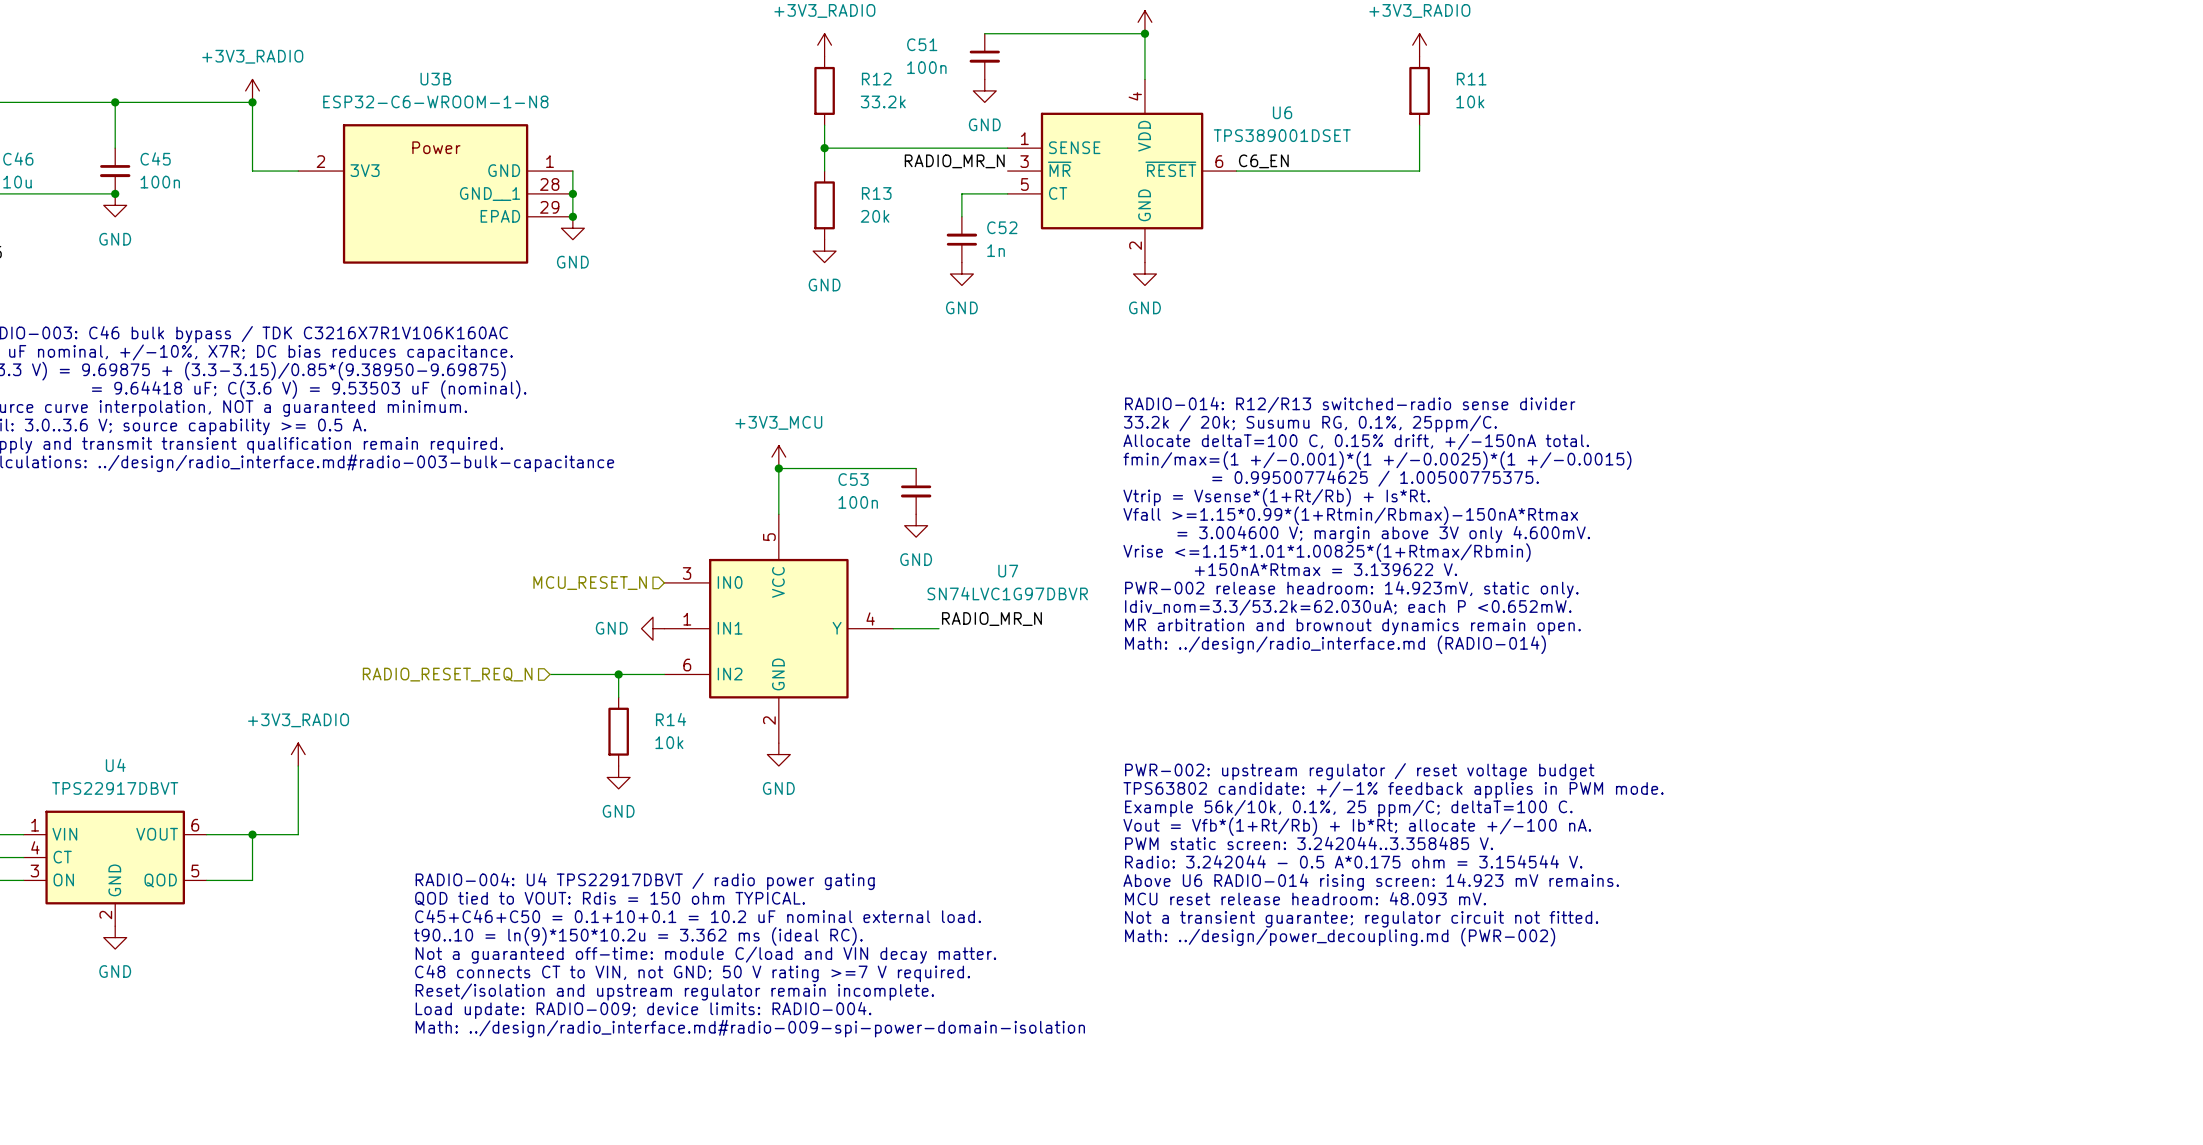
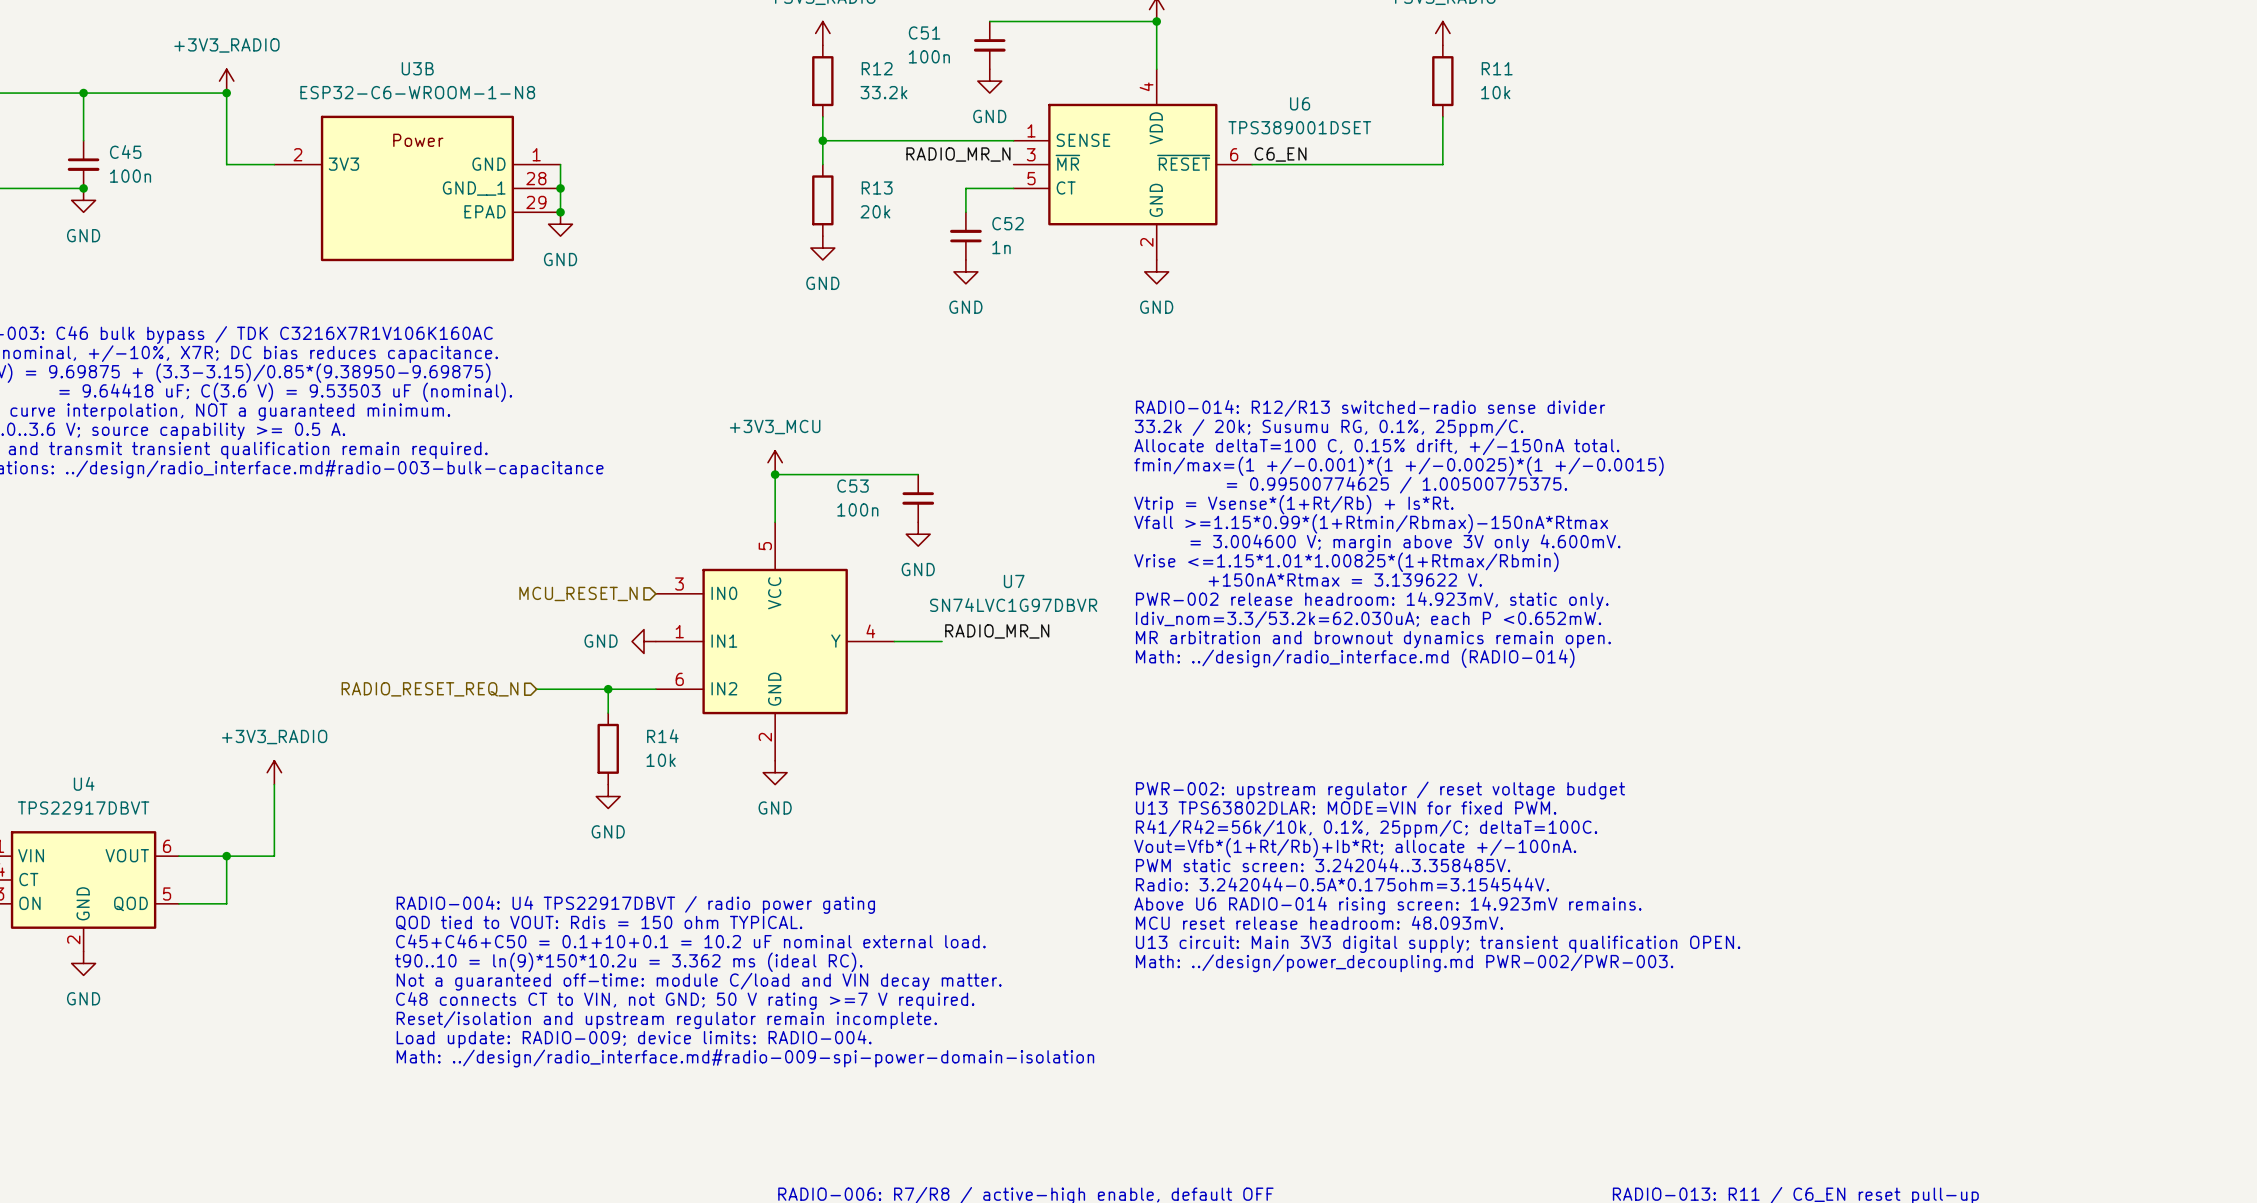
text: TPS63802 candidate: +/-1% feedback applies in PWM mode. (1393, 790) -> U13 TPS63802DLAR: MODE=VIN for fixed PWM. (1346, 807)
text: Example 56k/10k, 0.1%, 25 ppm/C; deltaT=100 C. (1348, 808) -> R41/R42=56k/10k, 0.1%, 25ppm/C; deltaT=100C. (1366, 828)
text: Vout = Vfb*(1+Rt/Rb) + Ib*Rt; allocate +/-100 nA. (1357, 826) -> Vout=Vfb*(1+Rt/Rb)+Ib*Rt; allocate +/-100nA. (1355, 847)
text: PWM static screen: 3.242044..3.358485 V. (1309, 843) -> PWM static screen: 3.242044..3.358485V. (1323, 865)
text: Radio: 3.242044 - 0.5 A*0.175 ohm = 3.154544 V. (1353, 861) -> Radio: 3.242044-0.5A*0.175ohm=3.154544V. (1342, 884)
text: Above U6 RADIO-014 rising screen: 14.923 mV remains. (1371, 882) -> Above U6 RADIO-014 rising screen: 14.923mV remains. (1387, 905)
text: MCU reset release headroom: 48.093 mV. (1305, 898) -> MCU reset release headroom: 48.093mV. (1319, 922)
text: Not a transient guarantee; regulator circuit not fitted. (1361, 919) -> U13 circuit: Main 3V3 digital supply; transient qualification OPEN. (1438, 944)
text: Math: ../design/power_decoupling.md (PWR-002) (1340, 937) -> Math: ../design/power_decoupling.md PWR-002/PWR-003. (1404, 963)

